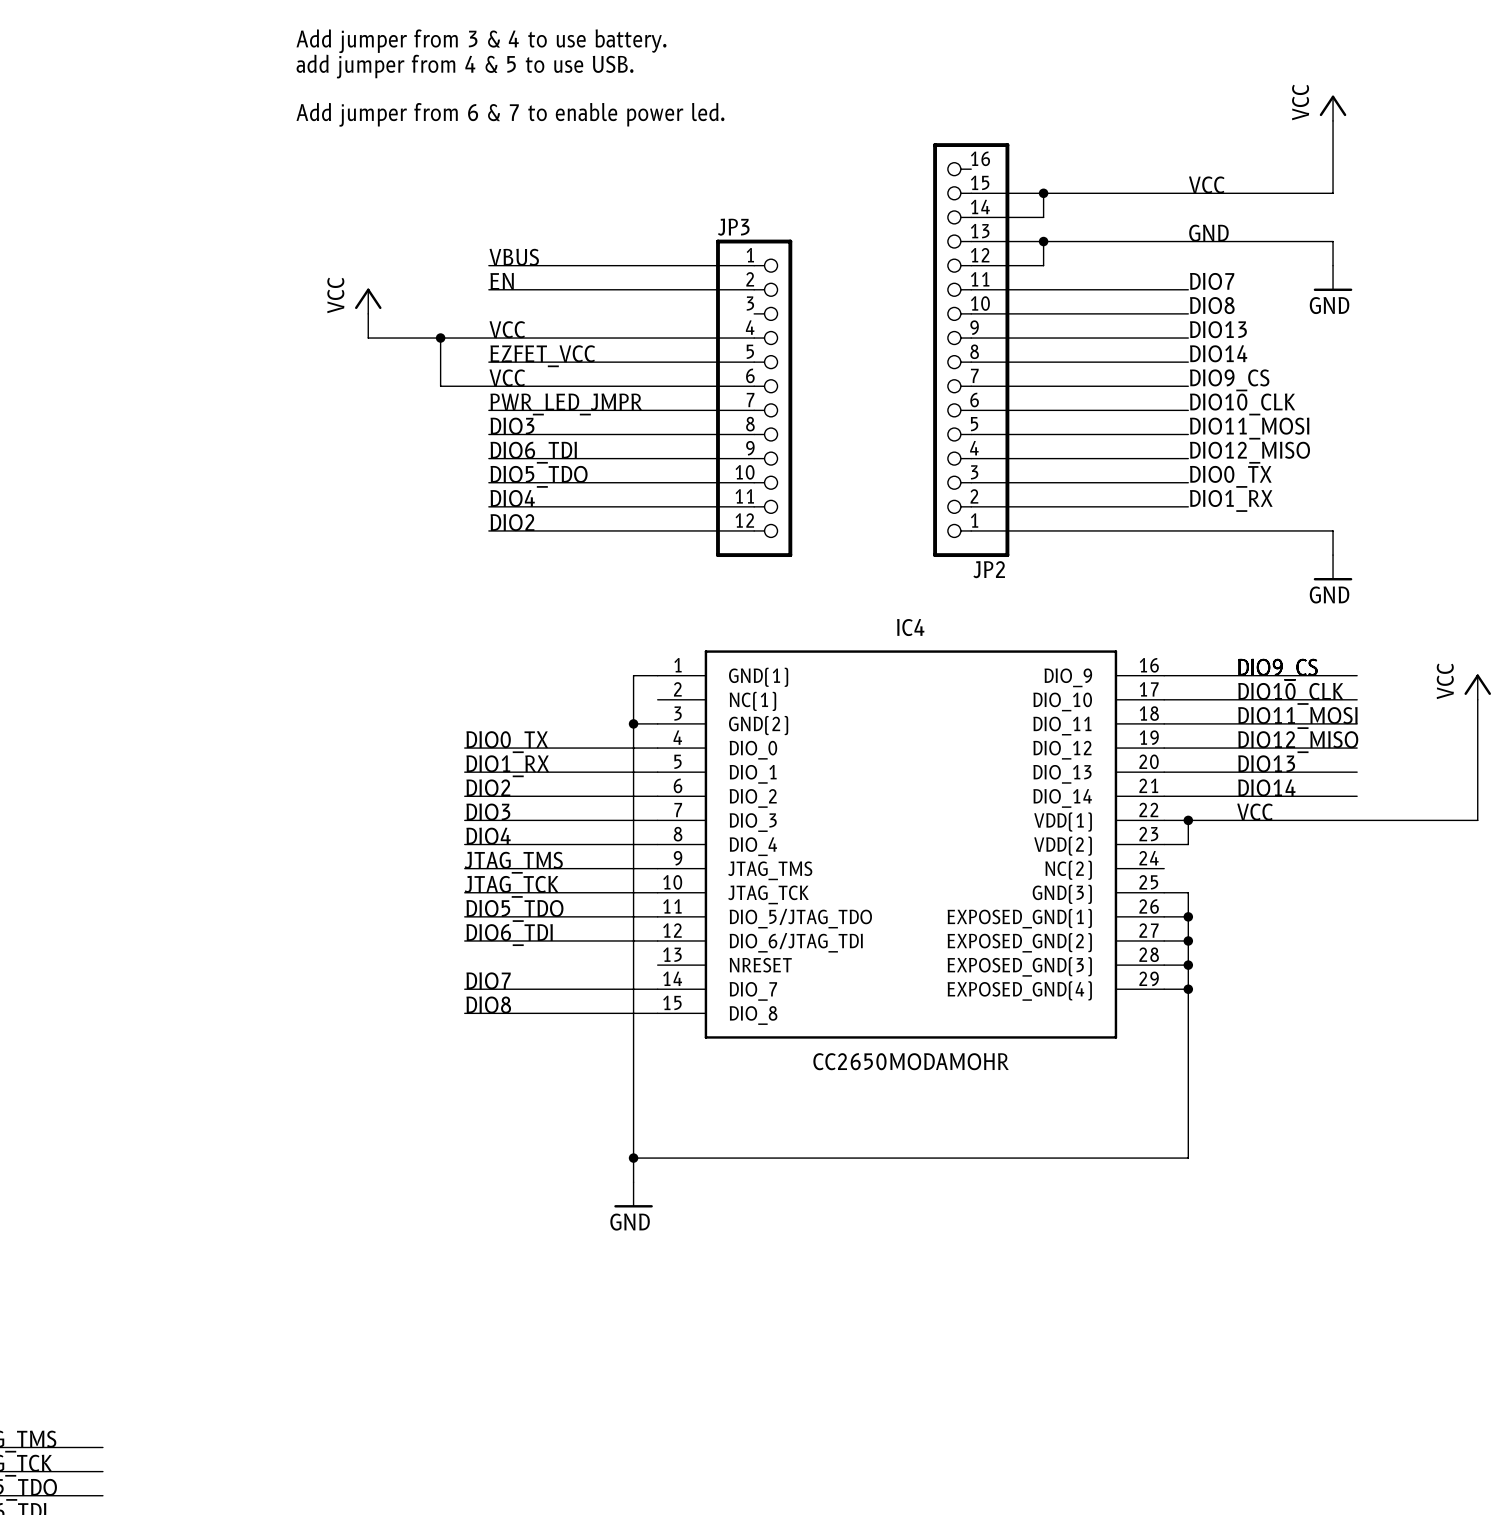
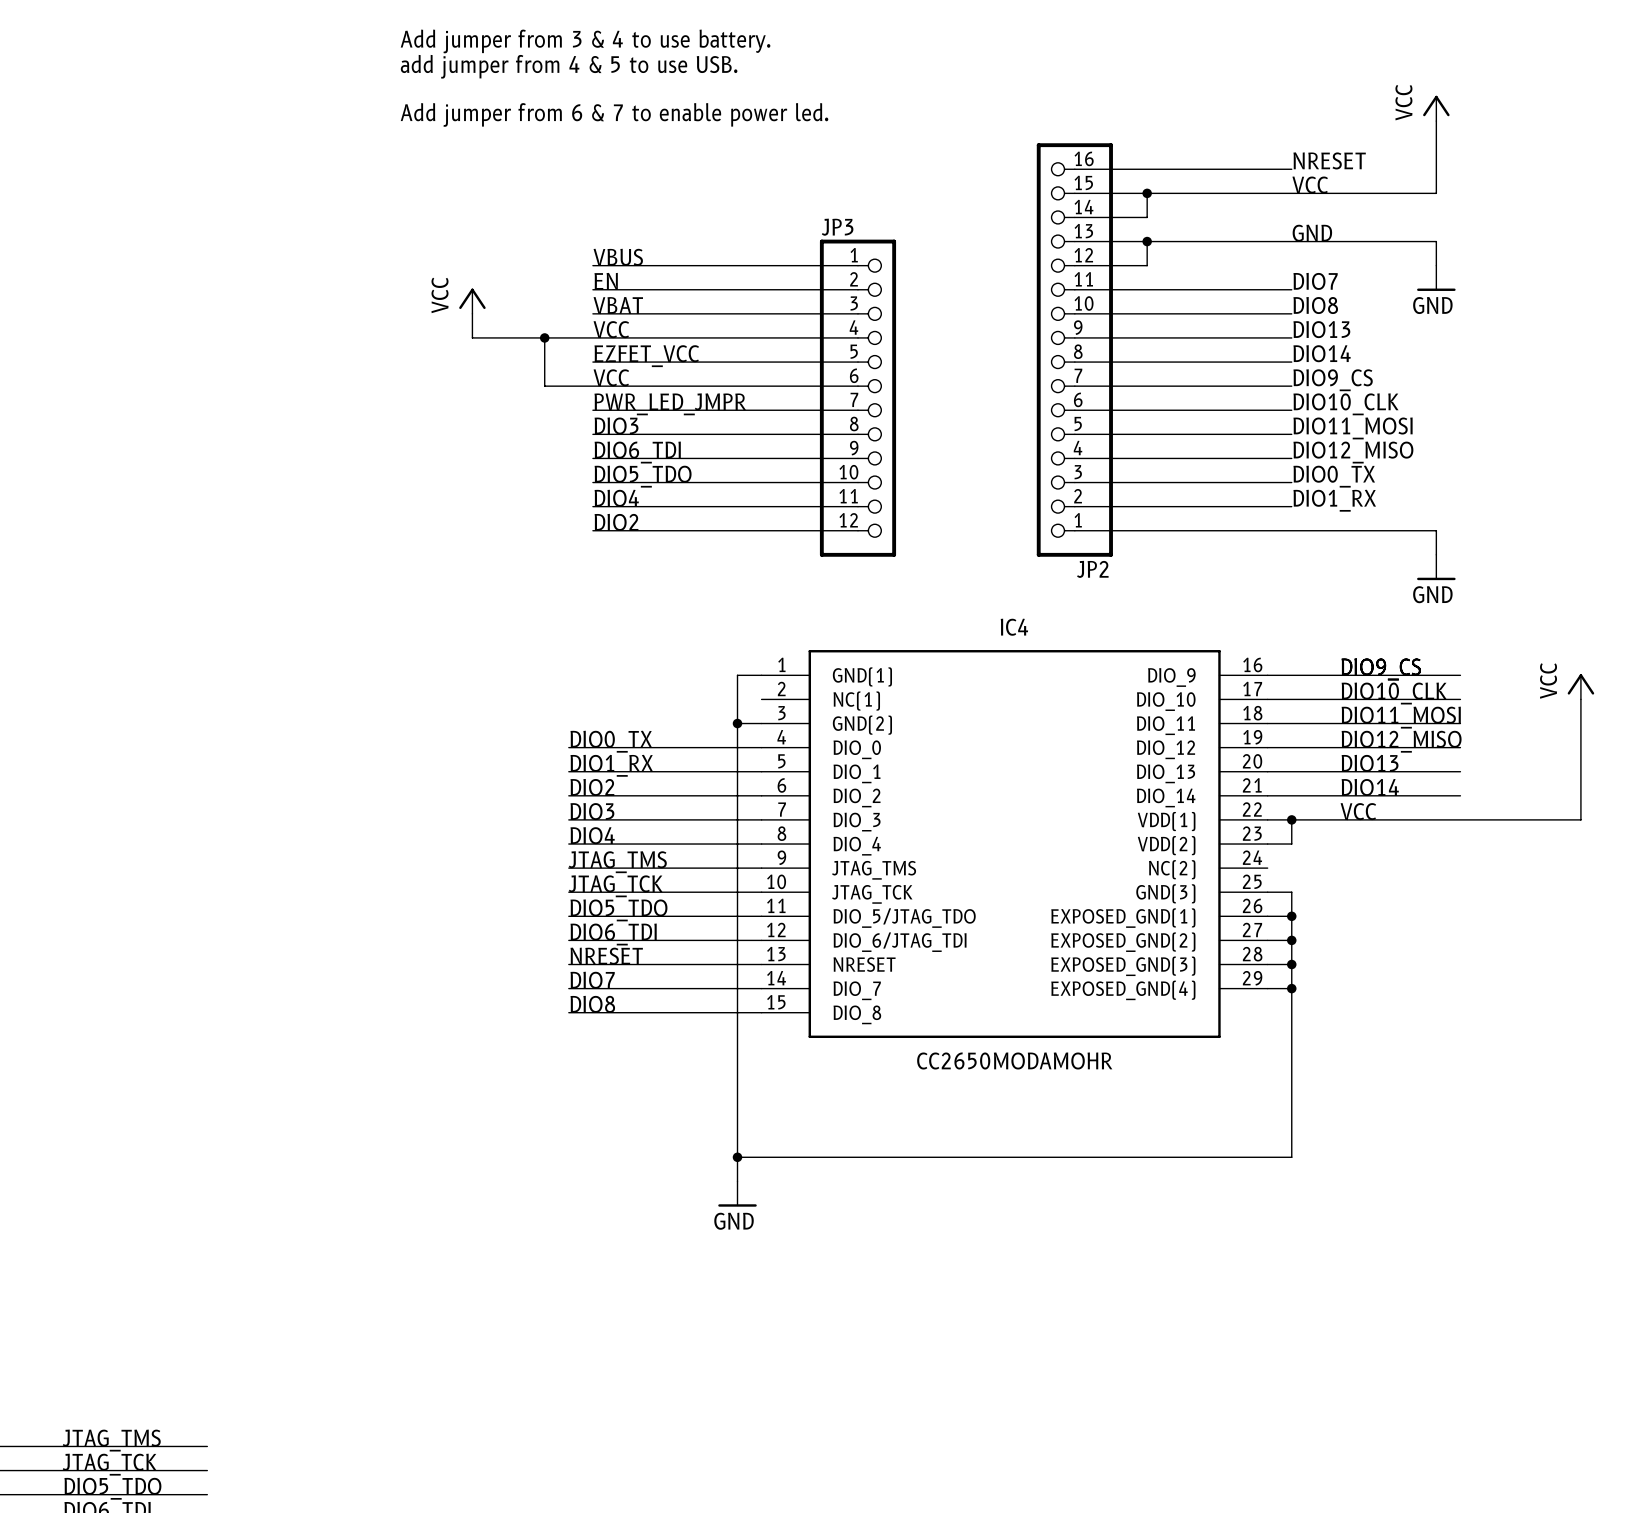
label: none -> NRESET (1329, 160)
wire: none -> (1074, 169) (1291, 169)
label: none -> VBAT (618, 305)
wire: none -> (592, 313) (857, 313)
label: none -> NRESET (606, 956)
wire: none -> (568, 964) (761, 964)

